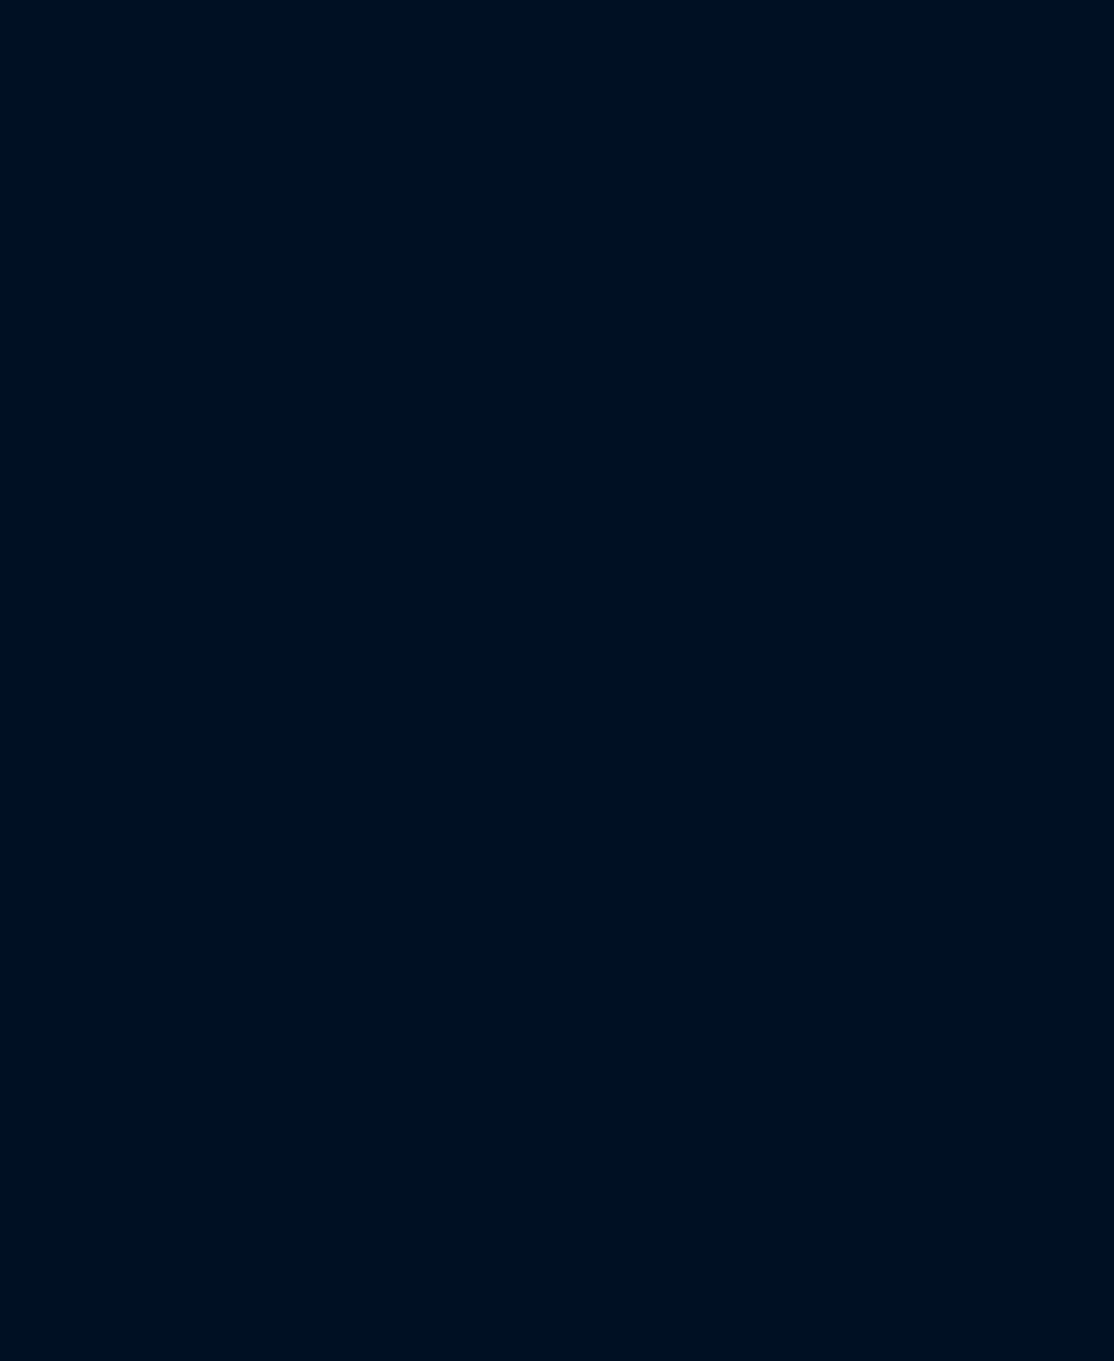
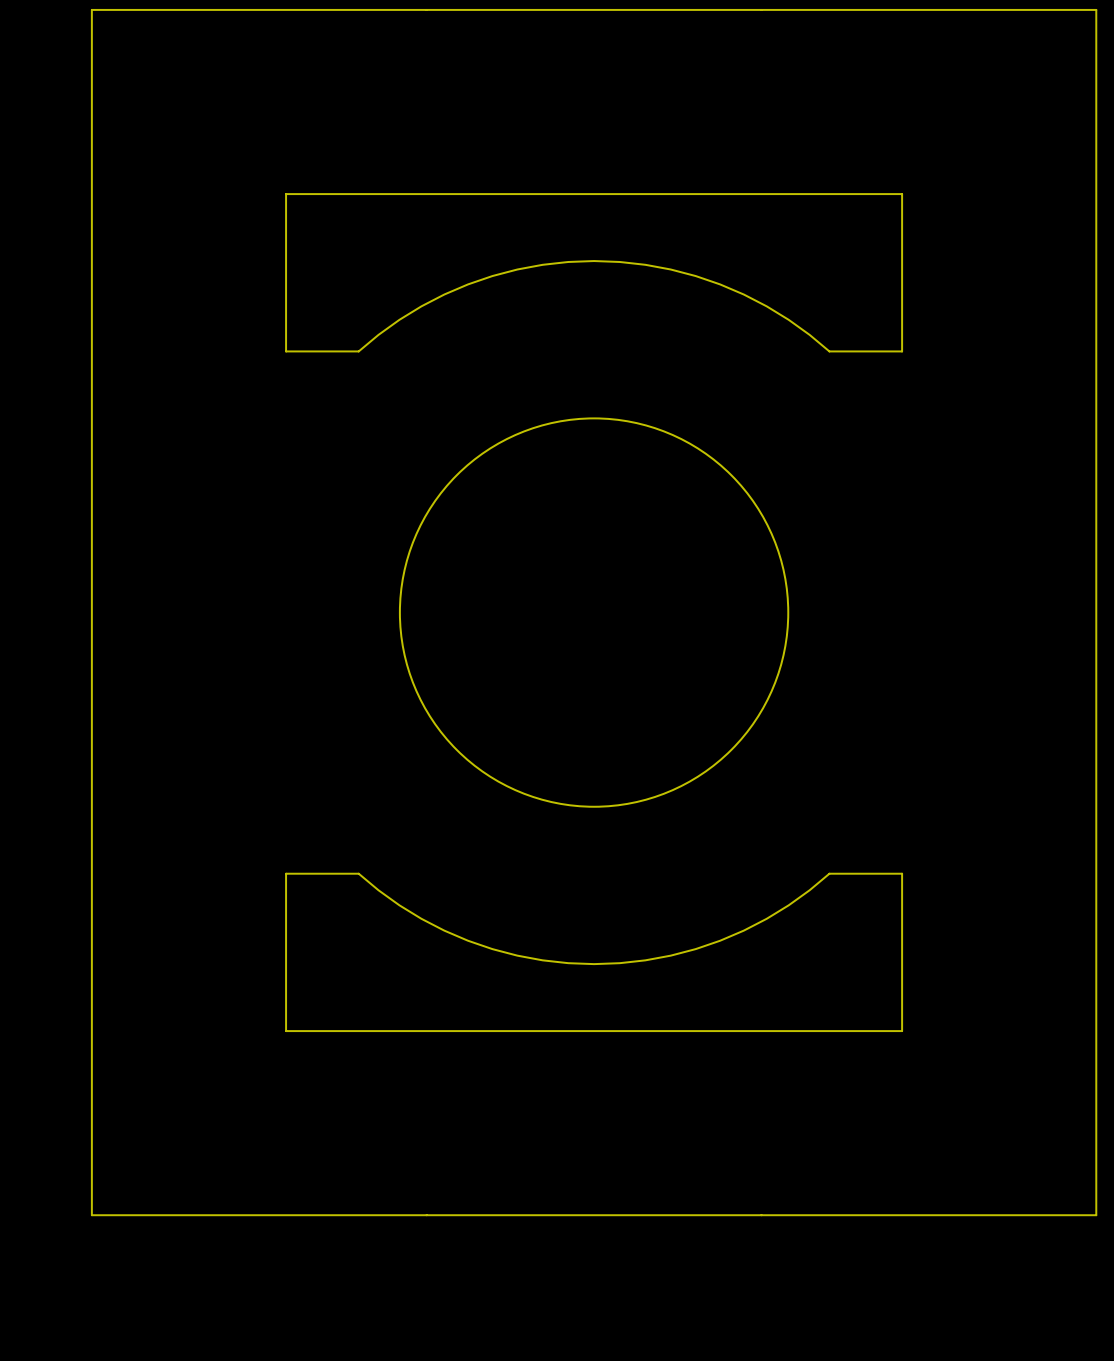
board edge: none -> (91, 9) (91, 1215) (1096, 1215) (1096, 9) (91, 9)
board edge: none -> (286, 194) (286, 351) (358, 351) (399, 319) (421, 306) (468, 284) (517, 269) (542, 264) (594, 261) (619, 261) (670, 269) (720, 284) (766, 306) (788, 319) (829, 351) (902, 351) (902, 194) (286, 194)
round board edge: none -> [399, 417, 790, 808]
board edge: none -> (286, 873) (286, 1031) (902, 1031) (902, 873) (829, 873) (809, 890) (766, 918) (720, 940) (670, 955) (619, 963) (594, 964) (542, 960) (492, 949) (468, 940) (421, 918) (399, 905) (358, 873) (286, 873)

